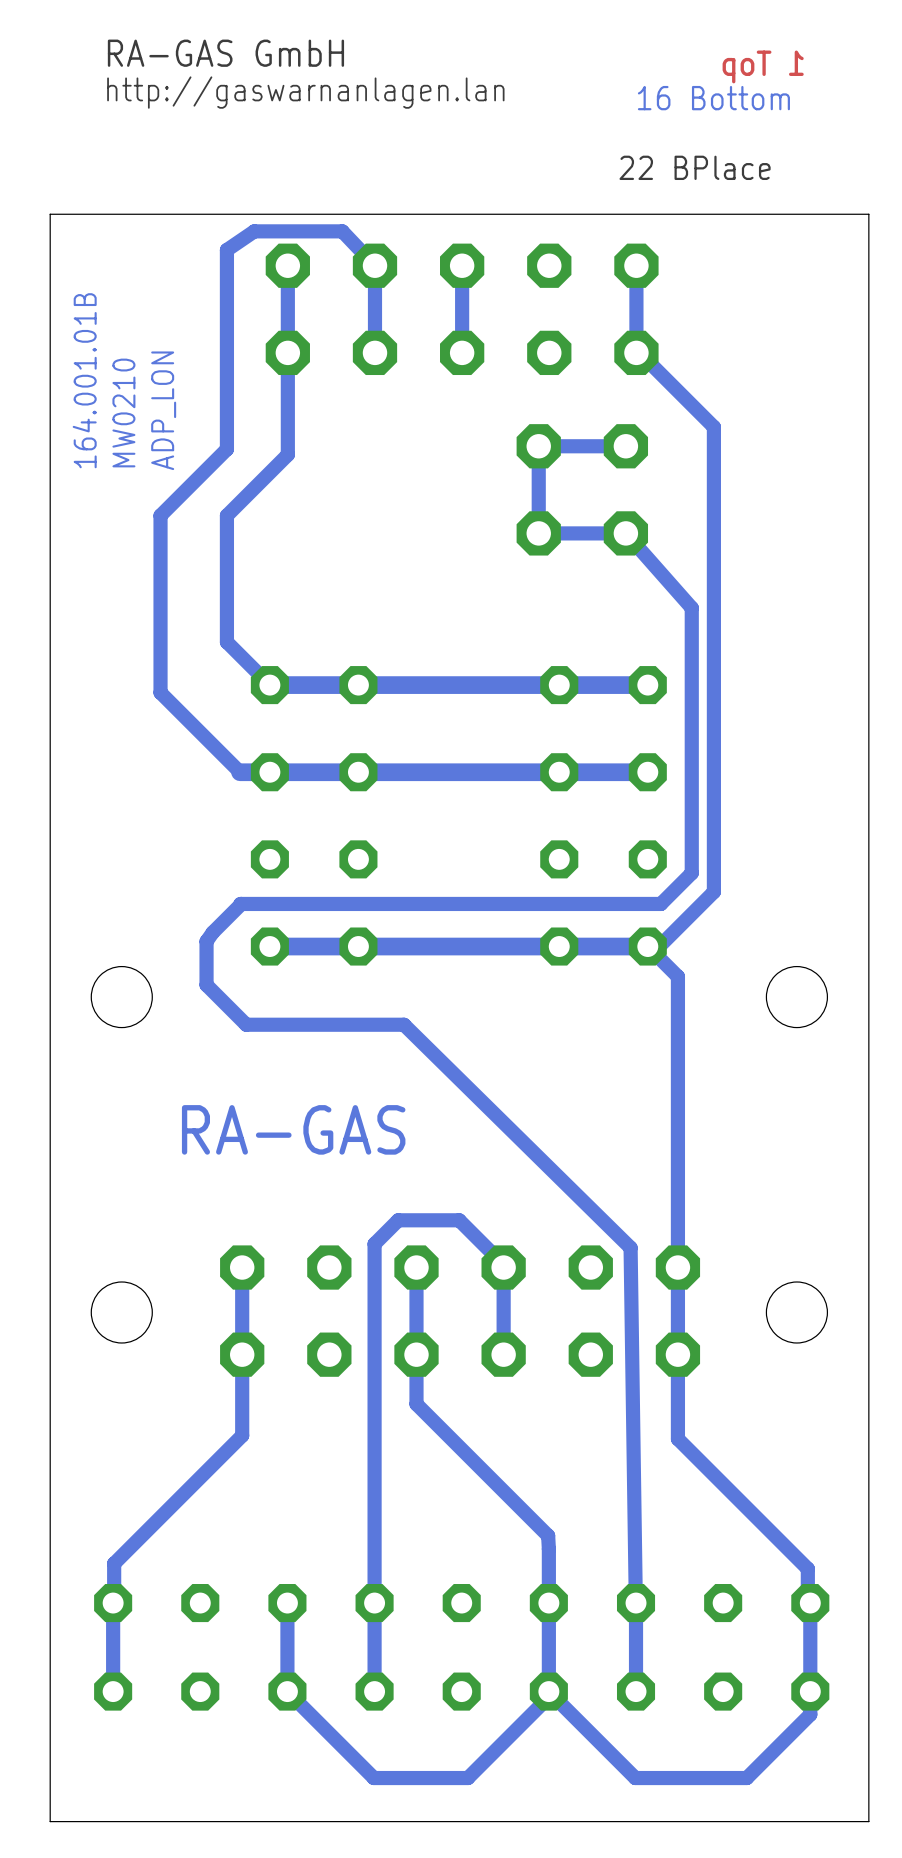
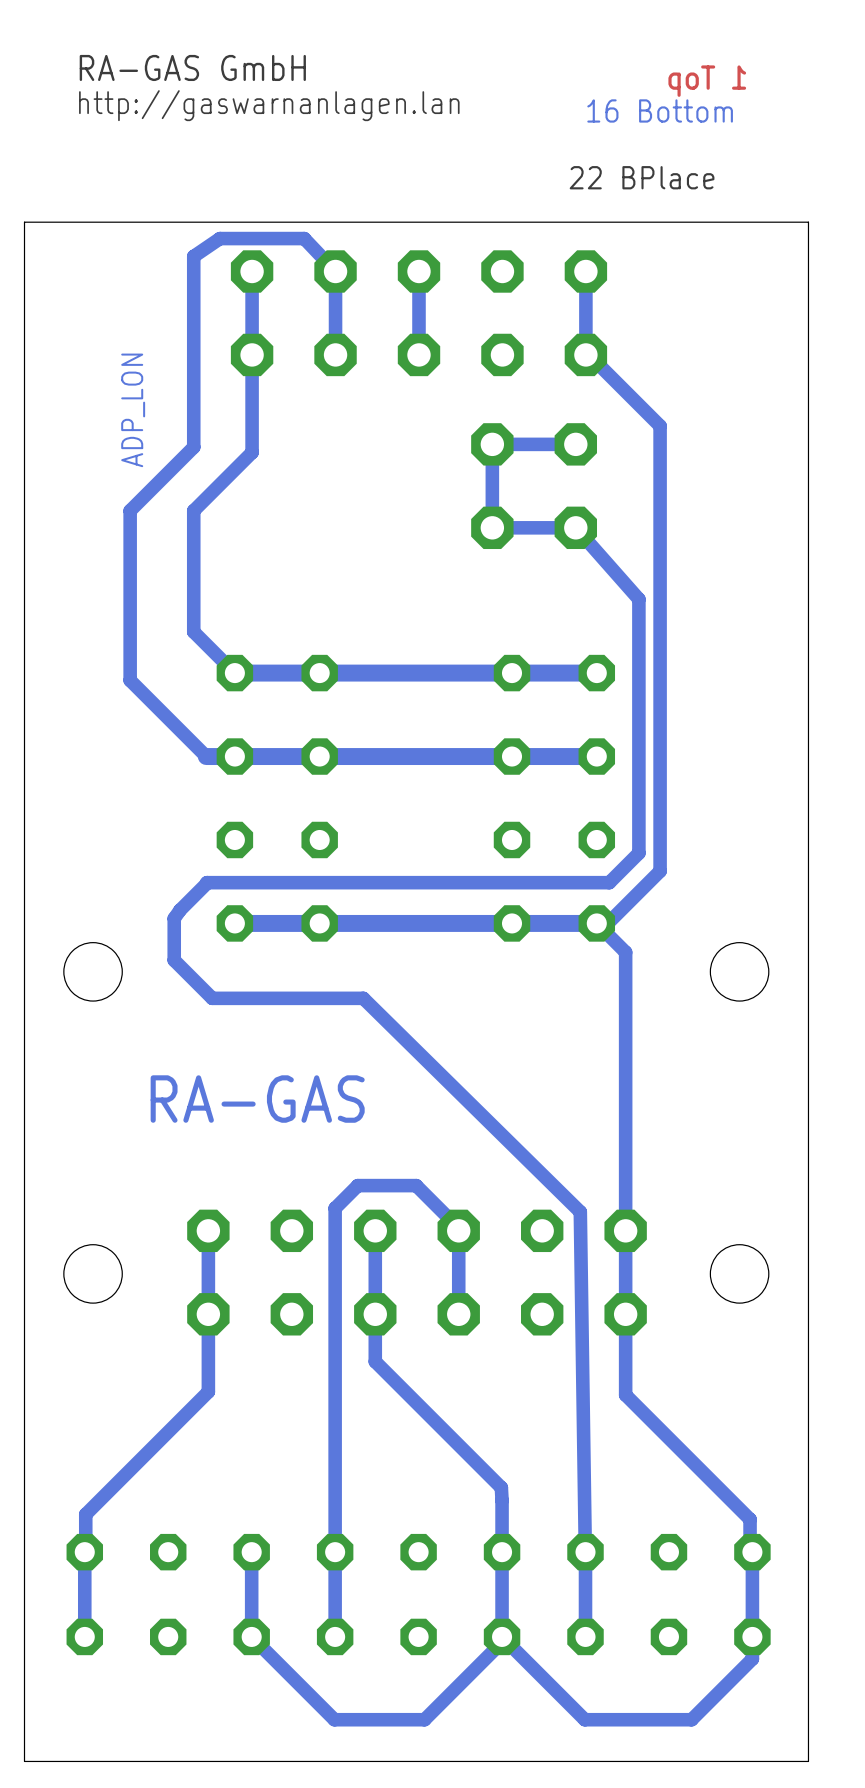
text: 164.001.01B (84, 380) -> none
text: MW0210 (123, 413) -> none

